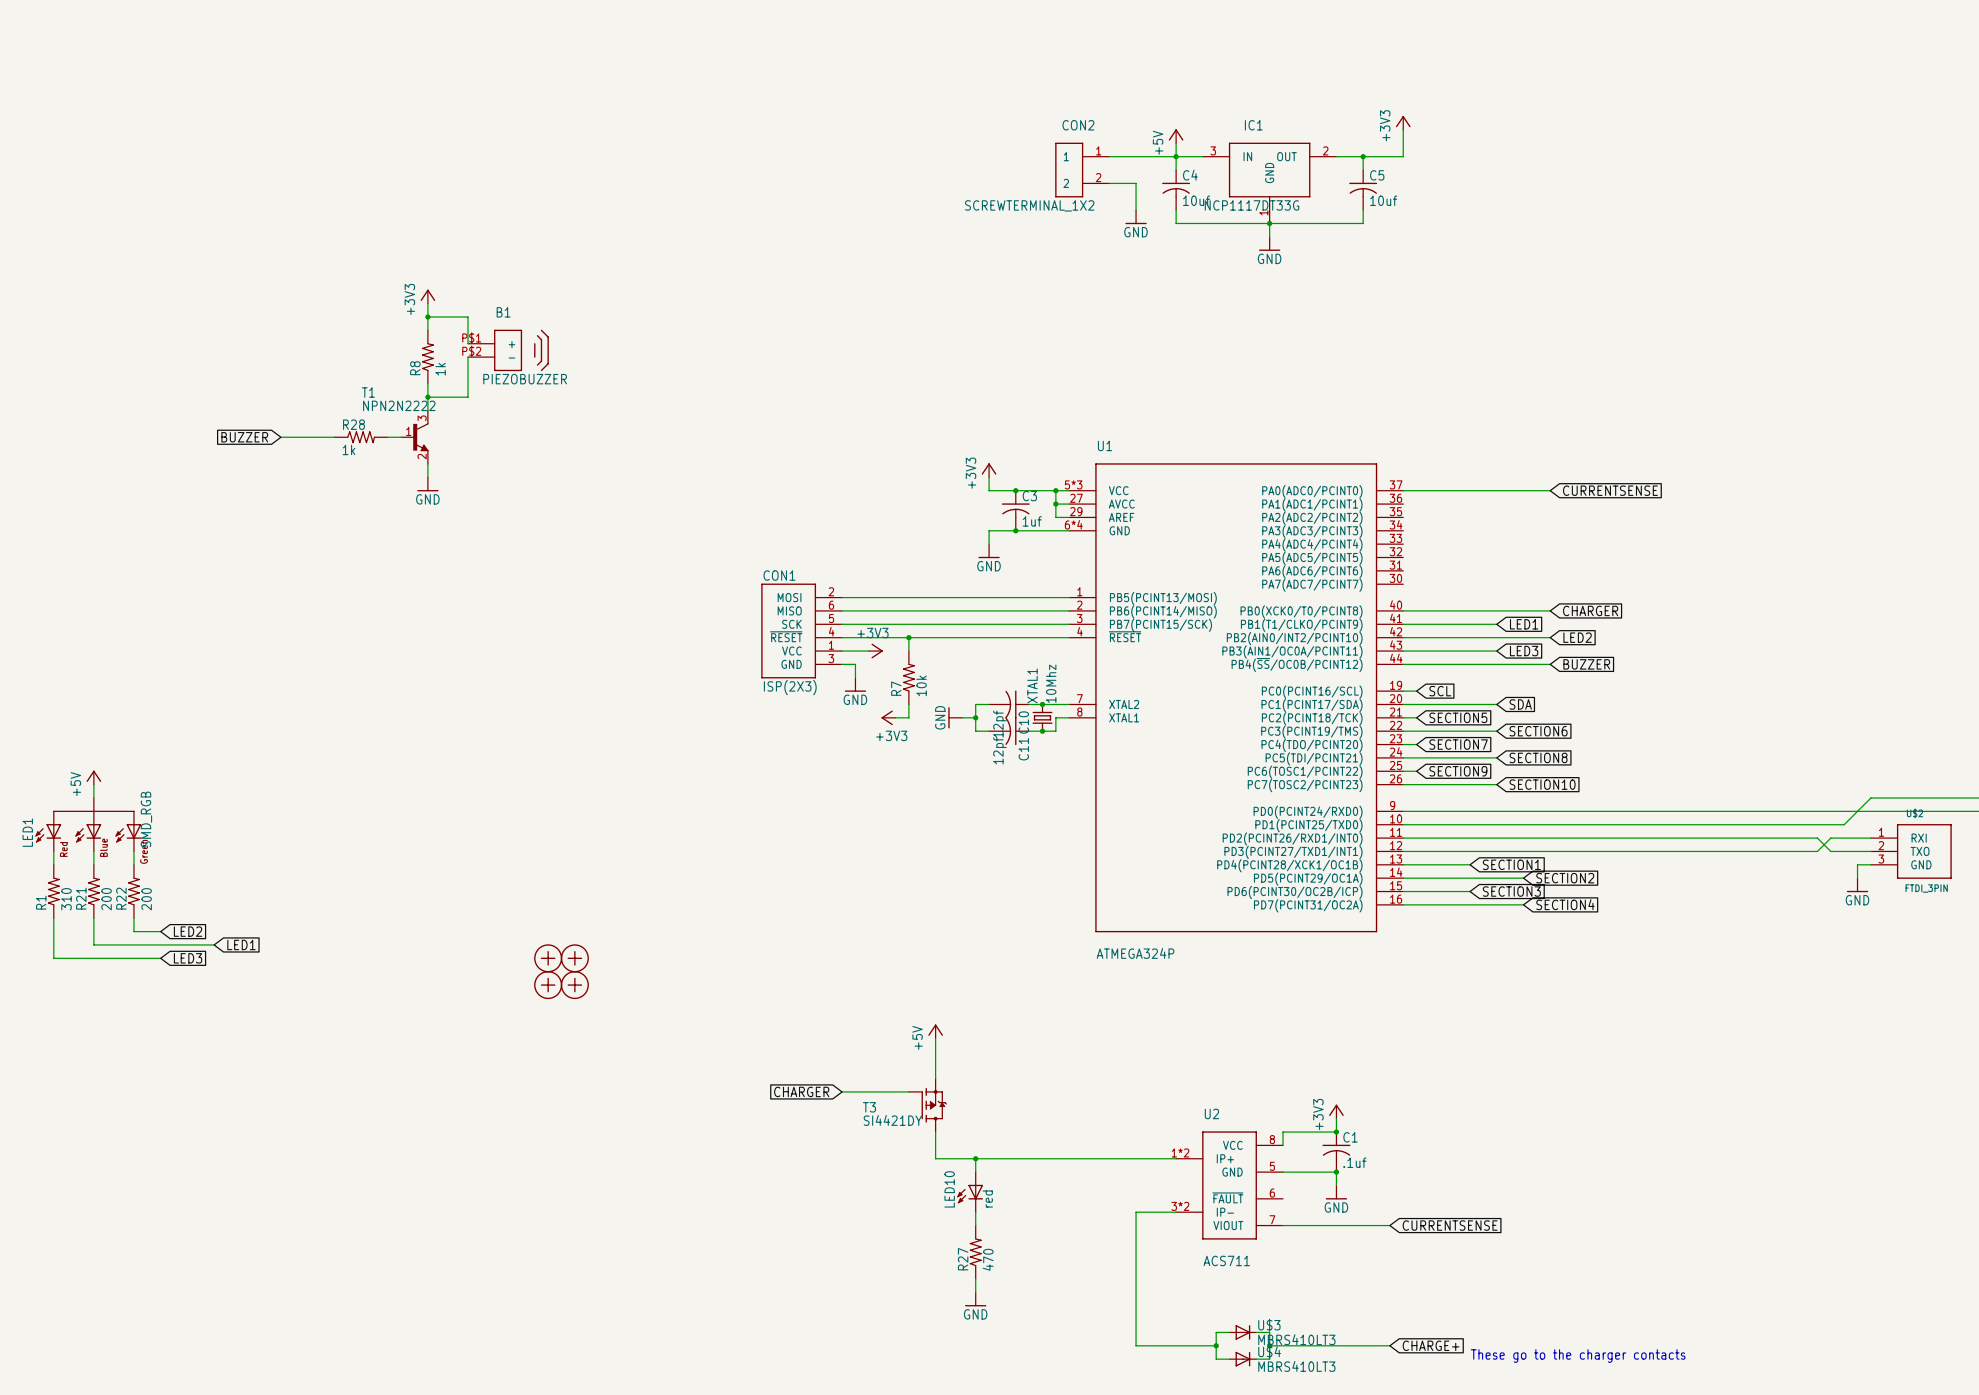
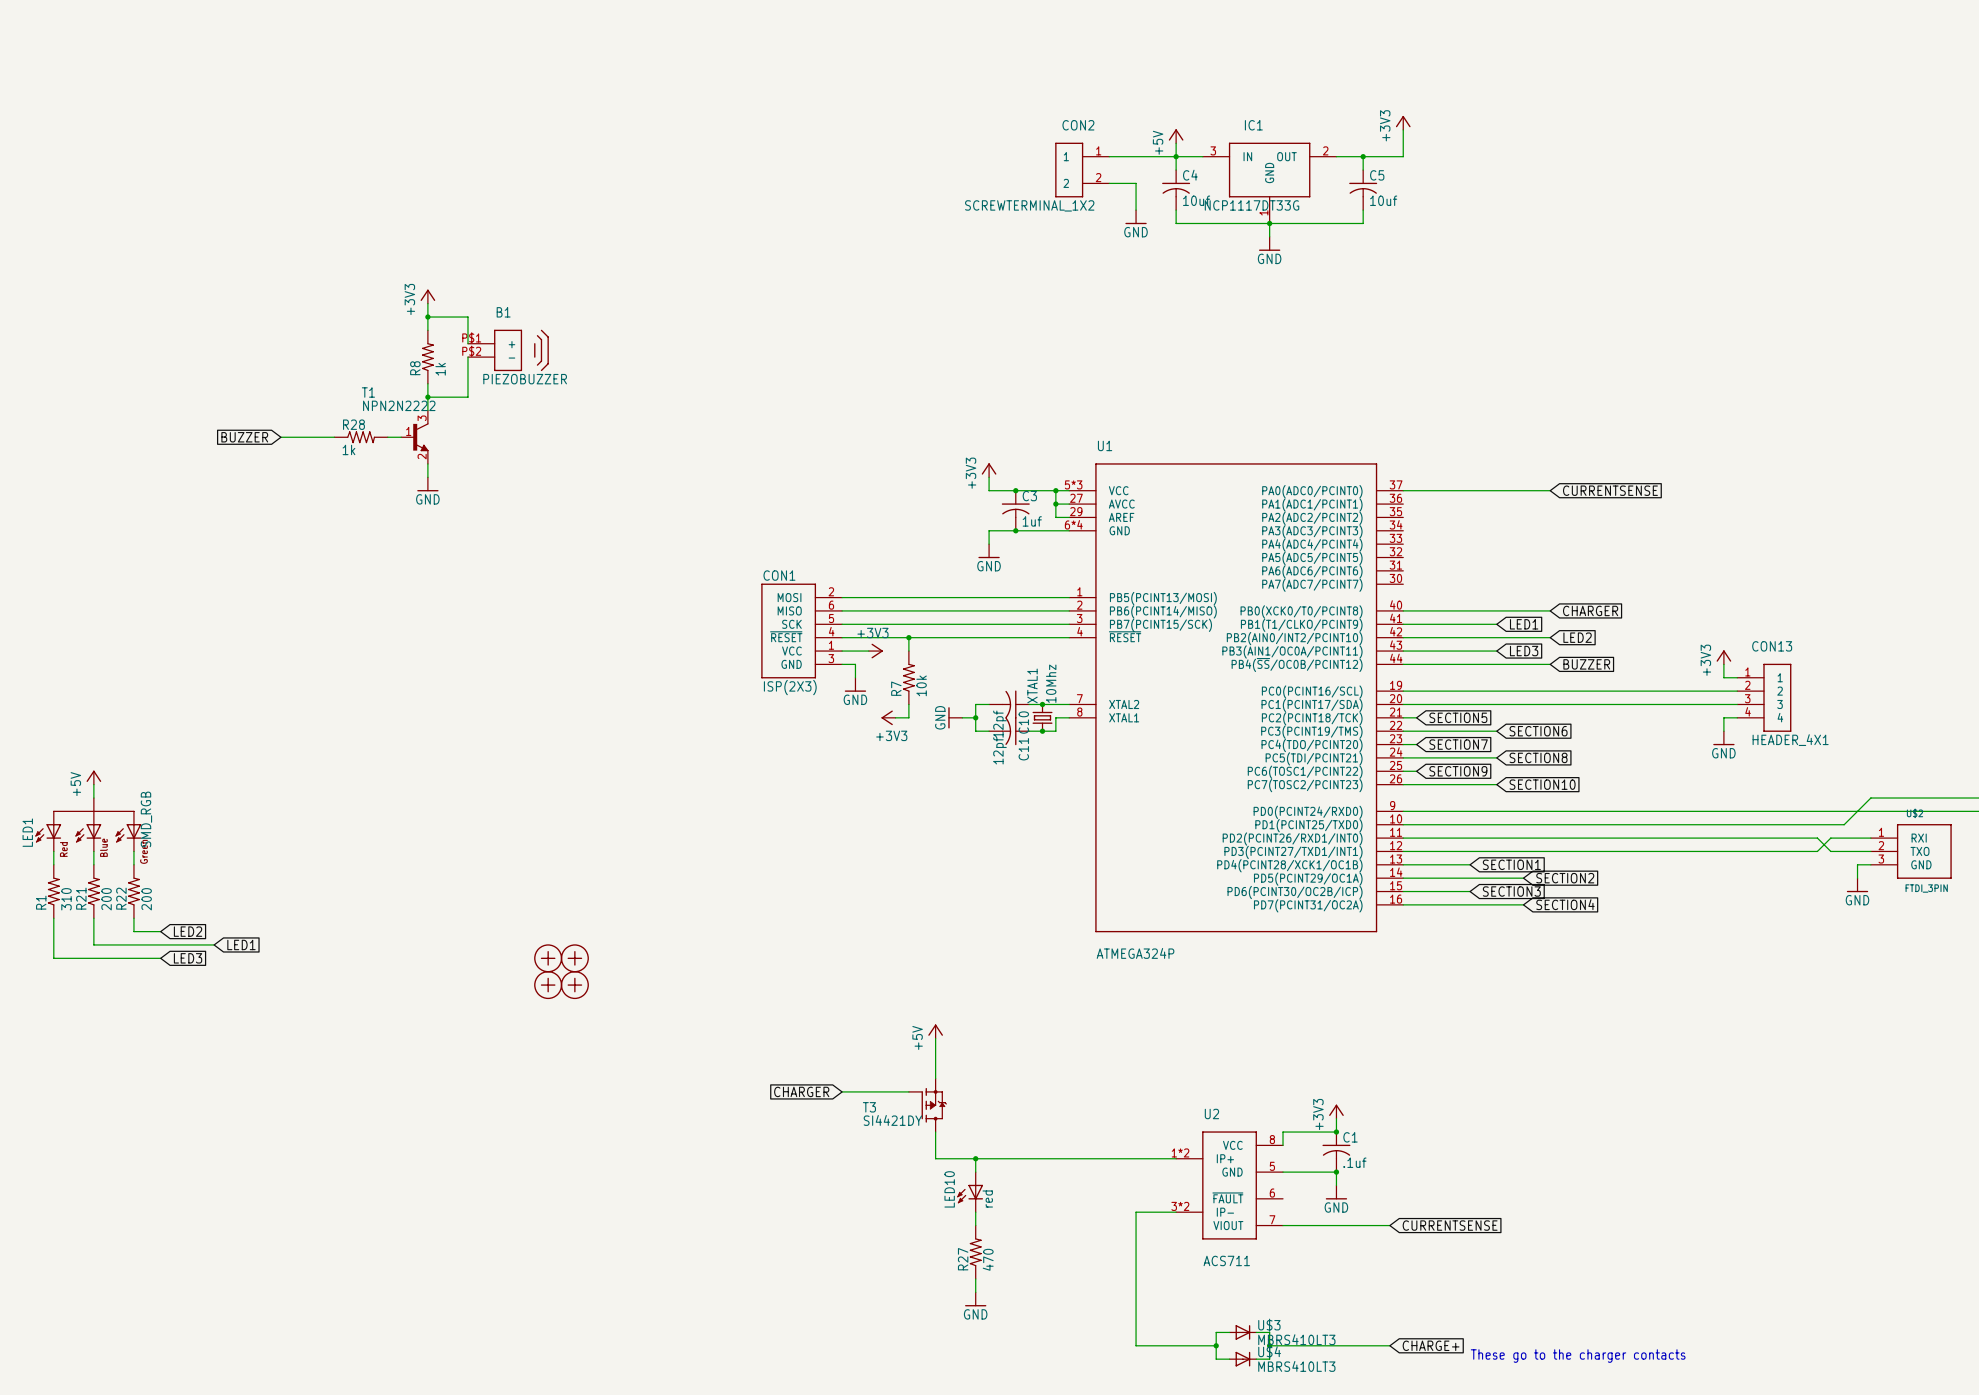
power symbol: none -> +3V3 (1723, 657)
wire: none -> (1723, 664) (1723, 677) (1737, 677)
wire: none -> (1416, 691) (1737, 691)
global label: SCL (1440, 691) -> none
CON13: none -> HEADER_4X1 (1764, 697)
wire: none -> (1496, 704) (1737, 704)
global label: SDA (1520, 704) -> none
wire: none -> (1737, 717) (1723, 717) (1723, 731)
power symbol: none -> GND (1723, 738)

